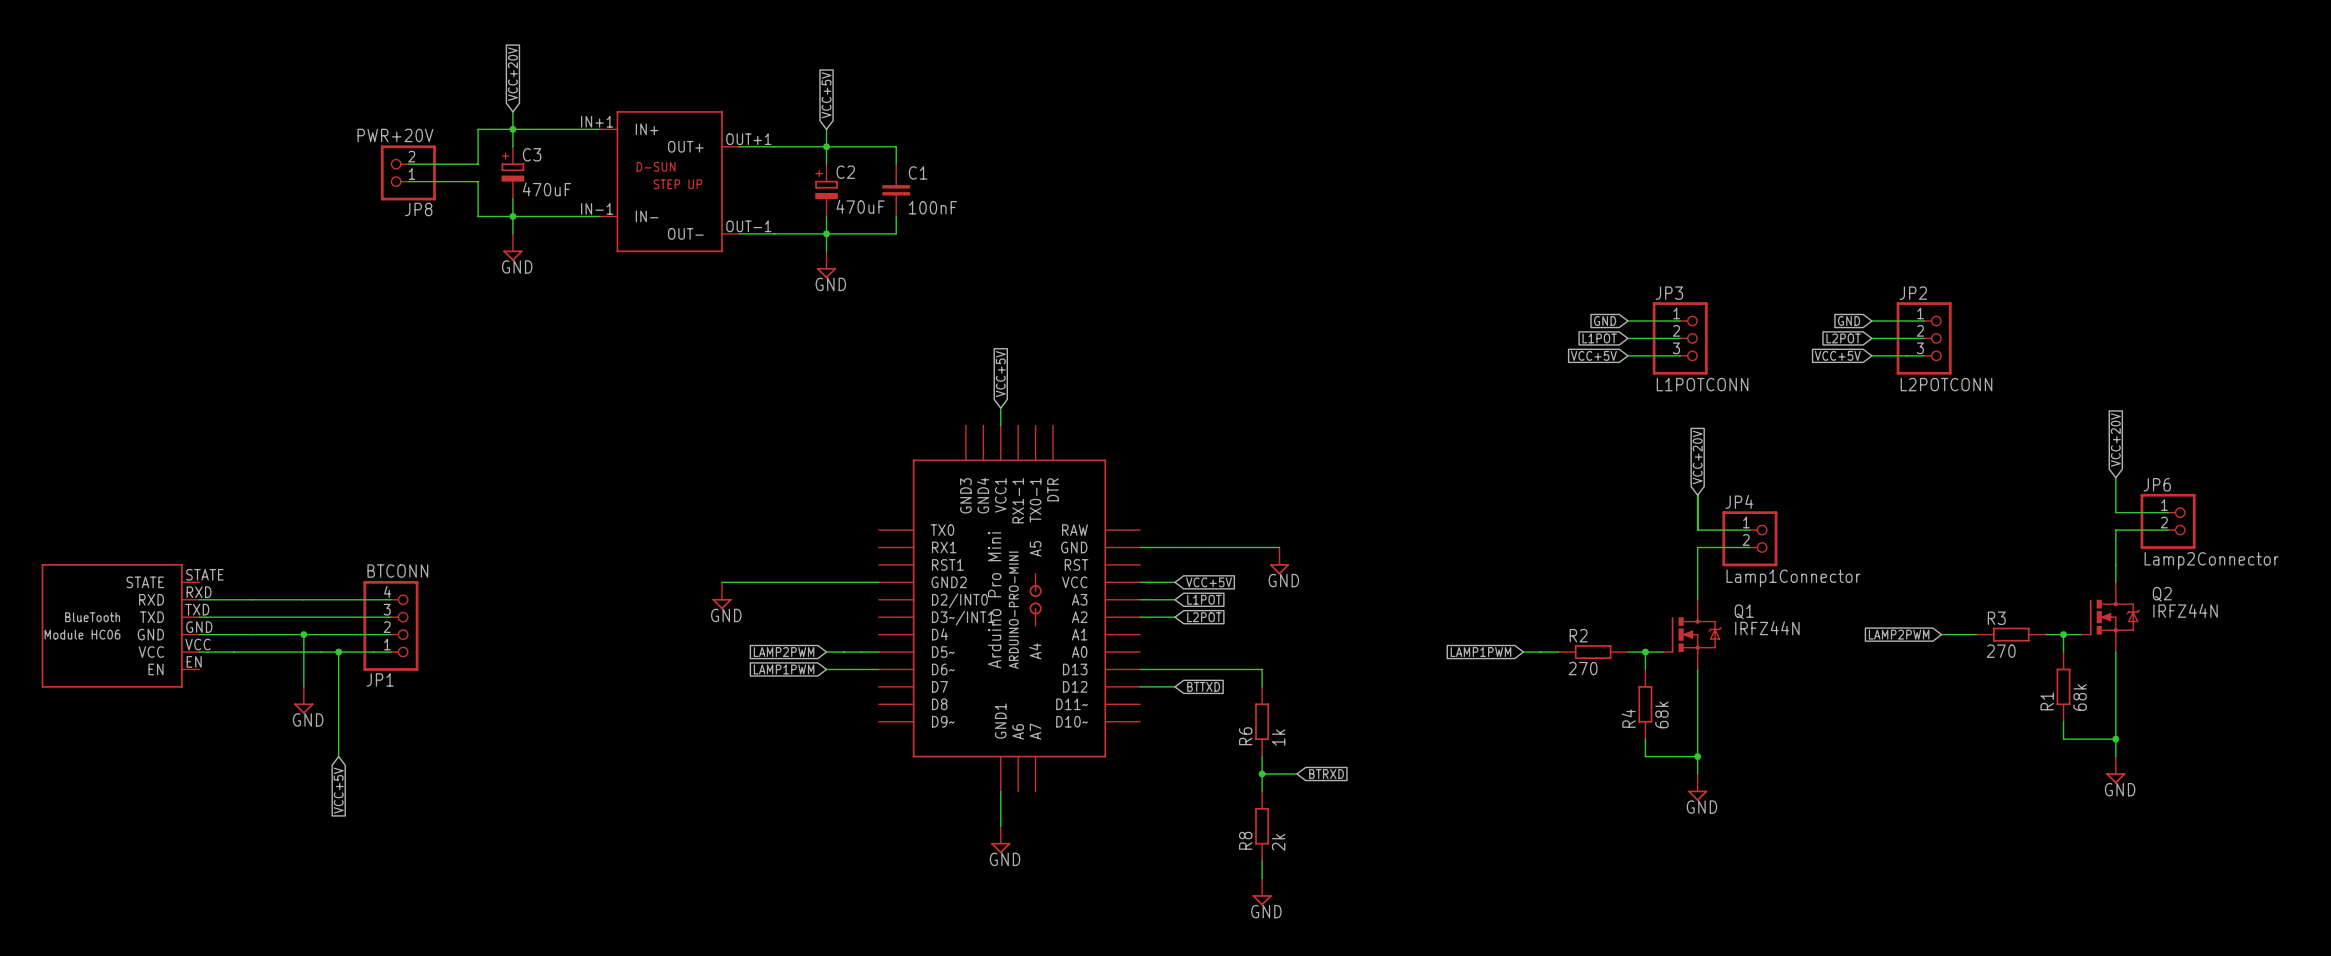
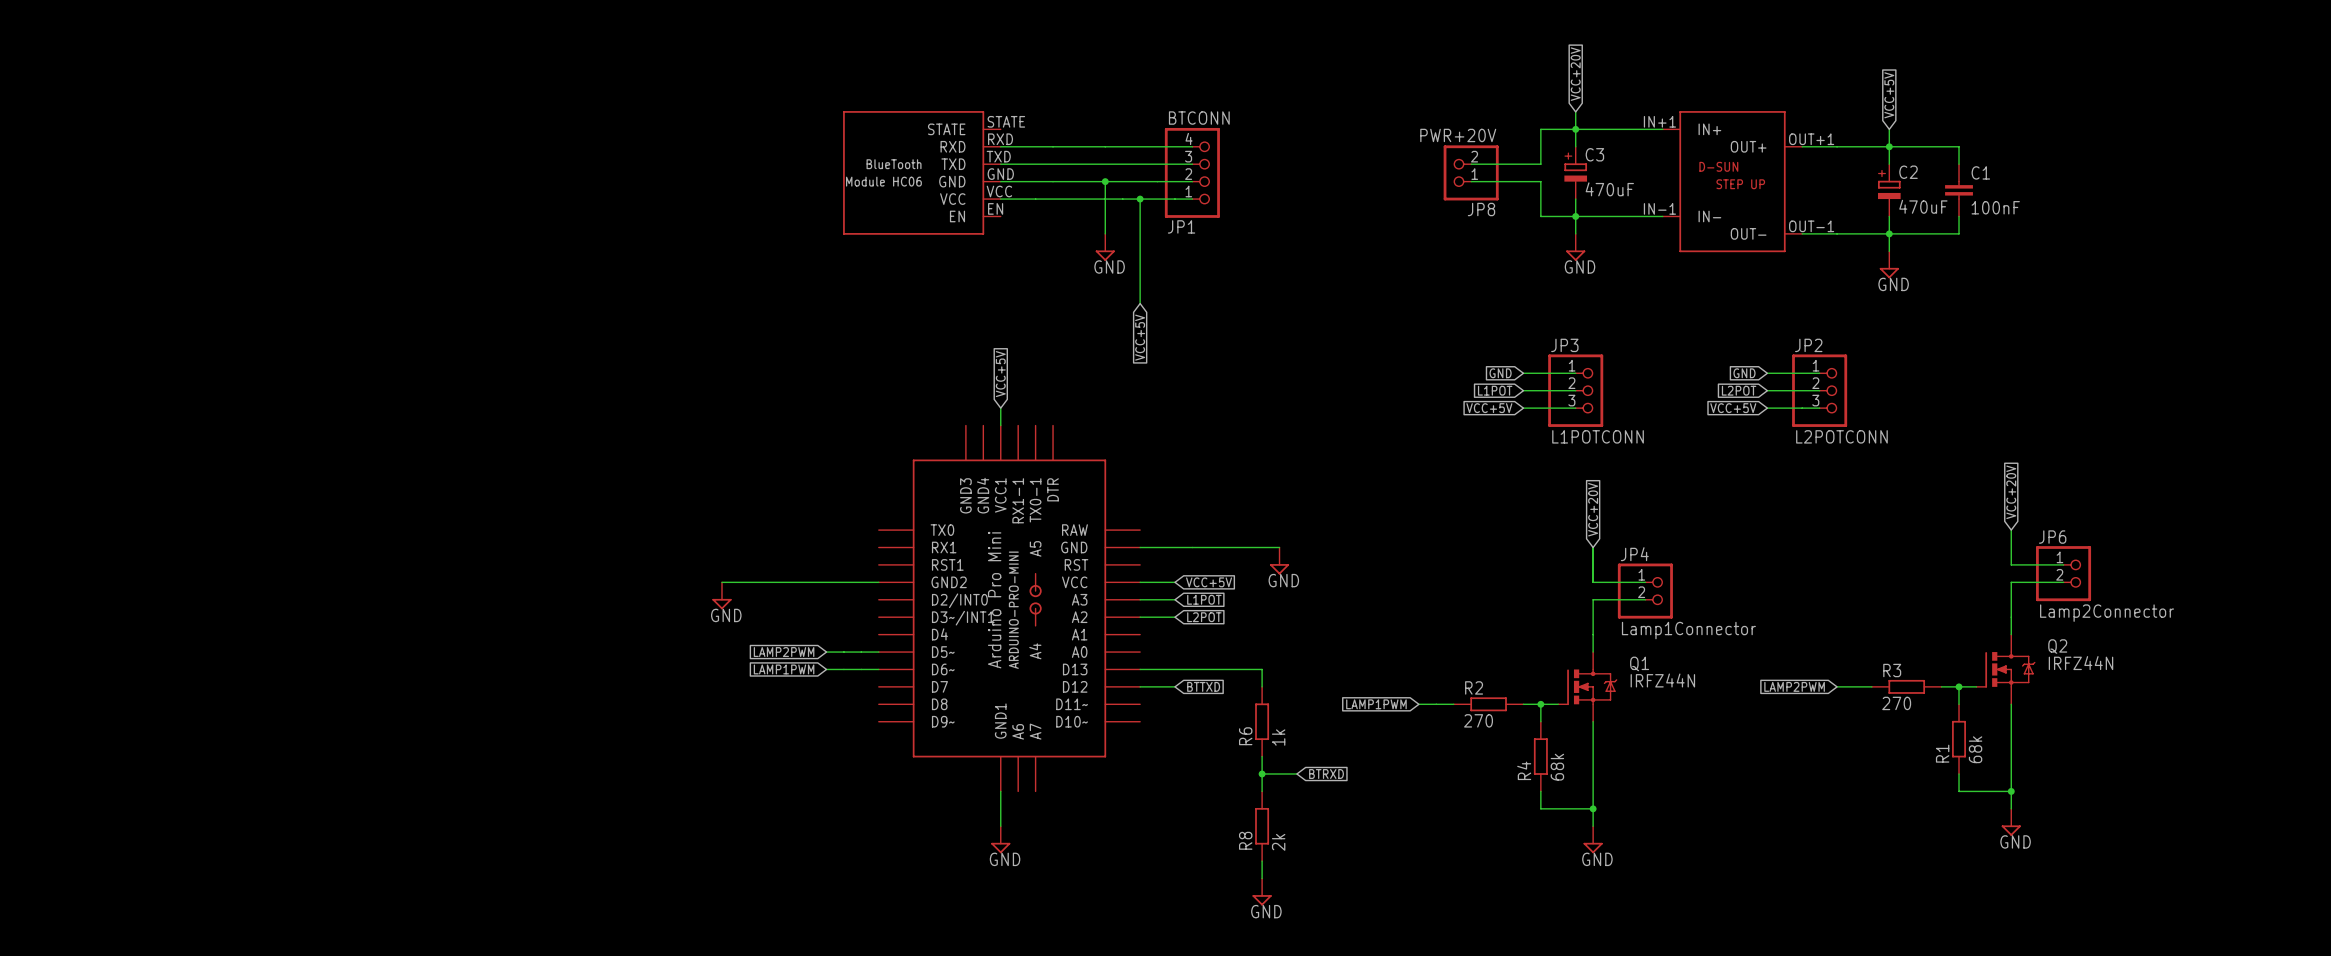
global label: VCC+20V (512, 74) -> none
global label: none -> VCC+20V (1575, 74)
global label: VCC+5V (826, 95) -> none
global label: none -> VCC+5V (1889, 95)
wire: (512, 111) (512, 146) -> none
wire: none -> (1575, 111) (1575, 146)
junction: (512, 129) -> none
wire: (600, 129) (478, 129) (478, 164) (408, 164) -> none
wire: (826, 129) (826, 164) -> none
junction: none -> (1575, 129)
wire: none -> (1662, 129) (1540, 129) (1540, 164) (1471, 164)
wire: none -> (1889, 129) (1889, 164)
wire: (739, 146) (896, 146) (896, 164) -> none
junction: (826, 146) -> none
wire: none -> (1000, 146) (1192, 146)
wire: none -> (1802, 146) (1959, 146) (1959, 164)
junction: none -> (1889, 146)
wire: none -> (1000, 164) (1192, 164)
JP8 position: (408, 172) -> (1471, 172)
C3 position: (512, 172) -> (1575, 172)
part: none -> (921, 172)
wire: (408, 181) (478, 181) (478, 216) (600, 216) -> none
part: (669, 181) -> none
wire: none -> (1000, 181) (1192, 181)
wire: none -> (1105, 181) (1105, 233)
junction: none -> (1105, 181)
wire: none -> (1471, 181) (1540, 181) (1540, 216) (1662, 216)
part: none -> (1732, 181)
C2 position: (826, 190) -> (1889, 190)
C1 position: (896, 190) -> (1959, 190)
wire: (512, 199) (512, 233) -> none
wire: none -> (1000, 199) (1192, 199)
wire: none -> (1140, 199) (1140, 303)
junction: none -> (1140, 199)
wire: none -> (1575, 199) (1575, 233)
junction: (512, 216) -> none
wire: (826, 216) (826, 251) -> none
wire: (896, 216) (896, 233) (739, 233) -> none
junction: none -> (1575, 216)
wire: none -> (1889, 216) (1889, 251)
wire: none -> (1959, 216) (1959, 233) (1802, 233)
junction: (826, 233) -> none
junction: none -> (1889, 233)
power symbol: GND (512, 247) -> none
power symbol: none -> GND (1105, 247)
power symbol: none -> GND (1575, 247)
power symbol: GND (826, 264) -> none
power symbol: none -> GND (1889, 264)
global label: GND (1605, 321) -> none
wire: (1627, 321) (1680, 321) -> (1523, 373) (1575, 373)
global label: GND (1849, 321) -> none
wire: (1871, 321) (1924, 321) -> (1767, 373) (1819, 373)
global label: none -> VCC+5V (1140, 337)
global label position: L1POT (1599, 338) -> L1POT (1495, 390)
wire: (1627, 338) (1680, 338) -> (1523, 390) (1575, 390)
JP3 position: (1680, 338) -> (1575, 390)
global label position: L2POT (1843, 338) -> L2POT (1739, 390)
wire: (1871, 338) (1924, 338) -> (1767, 390) (1819, 390)
JP2 position: (1924, 338) -> (1819, 390)
global label: VCC+5V (1593, 355) -> none
wire: (1627, 355) (1680, 355) -> (1523, 408) (1575, 408)
global label: VCC+5V (1837, 355) -> none
wire: (1871, 355) (1924, 355) -> (1767, 408) (1819, 408)
global label: none -> GND (1500, 373)
global label: none -> GND (1744, 373)
global label: none -> VCC+5V (1489, 408)
global label: none -> VCC+5V (1733, 408)
global label position: VCC+20V (2115, 440) -> VCC+20V (2011, 492)
global label position: VCC+20V (1697, 457) -> VCC+20V (1593, 509)
wire: (2115, 477) (2115, 512) (2168, 512) -> (2011, 530) (2011, 564) (2063, 564)
wire: (1697, 495) (1697, 530) (1749, 530) -> (1593, 547) (1593, 582) (1645, 582)
JP6 position: (2168, 521) -> (2063, 573)
wire: (2168, 530) (2115, 530) (2115, 582) -> (2063, 582) (2011, 582) (2011, 634)
JP4 position: (1749, 538) -> (1645, 591)
wire: (1749, 547) (1697, 547) (1697, 599) -> (1645, 599) (1593, 599) (1593, 652)
wire: (199, 599) (390, 599) -> none
wire: (199, 617) (390, 617) -> none
Q2 position: (2110, 617) -> (2005, 669)
part: (120, 625) -> none
JP1 position: (390, 625) -> (1192, 172)
wire: (199, 634) (390, 634) -> none
wire: (303, 634) (303, 686) -> none
junction: (303, 634) -> none
Q1 position: (1692, 634) -> (1587, 686)
global label position: LAMP2PWM (1899, 634) -> LAMP2PWM (1794, 686)
wire: (1941, 634) (1976, 634) -> (1837, 686) (1871, 686)
R3 position: (2011, 634) -> (1906, 686)
wire: (2046, 634) (2080, 634) -> (1941, 686) (1976, 686)
wire: (2063, 634) (2063, 652) -> (1959, 686) (1959, 704)
junction: (2063, 634) -> none
wire: (199, 652) (390, 652) -> none
wire: (338, 652) (338, 756) -> none
junction: (338, 652) -> none
global label position: LAMP1PWM (1480, 652) -> LAMP1PWM (1376, 704)
wire: (1523, 652) (1558, 652) -> (1418, 704) (1453, 704)
R2 position: (1593, 652) -> (1488, 704)
wire: (1627, 652) (1662, 652) -> (1523, 704) (1558, 704)
wire: (1645, 652) (1645, 669) -> (1540, 704) (1540, 721)
junction: (1645, 652) -> none
wire: (2115, 652) (2115, 756) -> (2011, 704) (2011, 808)
wire: (1697, 669) (1697, 774) -> (1593, 721) (1593, 826)
junction: none -> (1959, 686)
R1 position: (2063, 686) -> (1959, 739)
power symbol: GND (303, 700) -> none
junction: none -> (1540, 704)
R4 position: (1645, 704) -> (1540, 756)
wire: (2063, 721) (2063, 739) (2115, 739) -> (1959, 774) (1959, 791) (2011, 791)
wire: (1645, 739) (1645, 756) (1697, 756) -> (1540, 791) (1540, 808) (1593, 808)
junction: (2115, 739) -> none
junction: (1697, 756) -> none
power symbol position: GND (2115, 770) -> GND (2011, 822)
power symbol position: GND (1697, 787) -> GND (1593, 839)
global label: VCC+5V (338, 790) -> none
junction: none -> (2011, 791)
junction: none -> (1593, 808)

